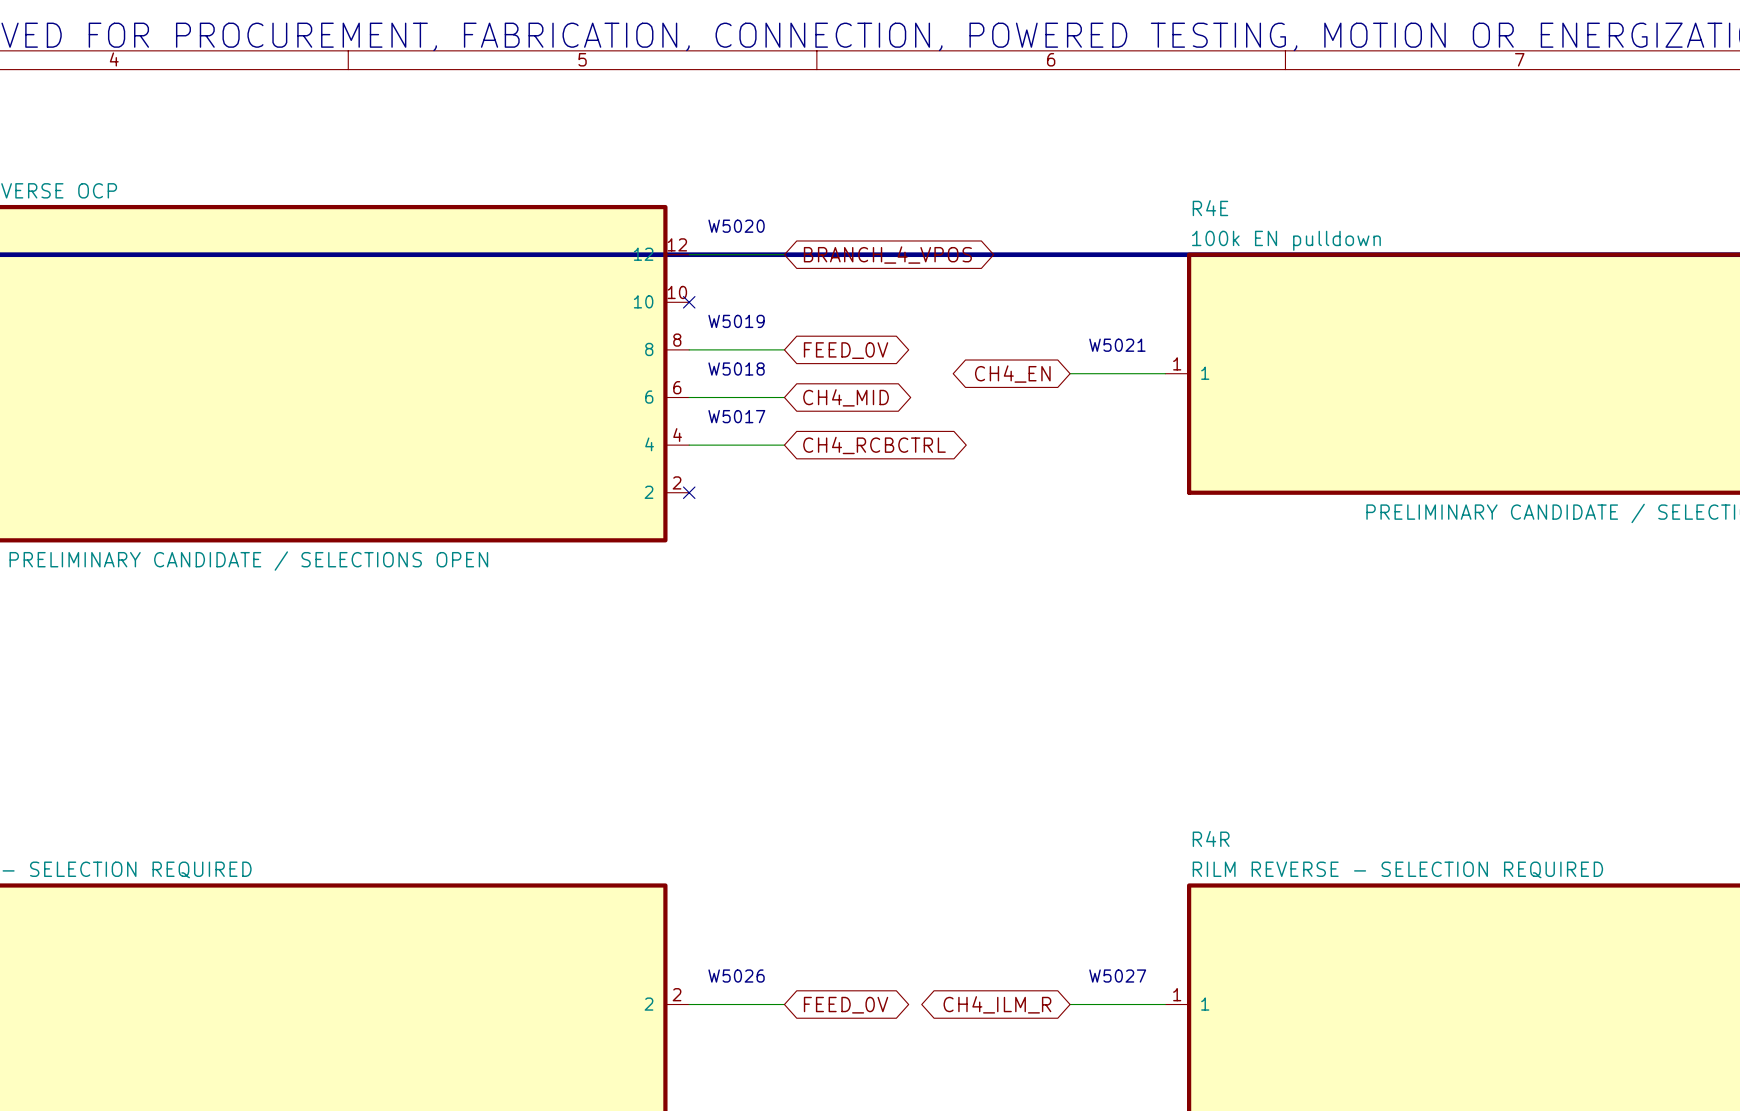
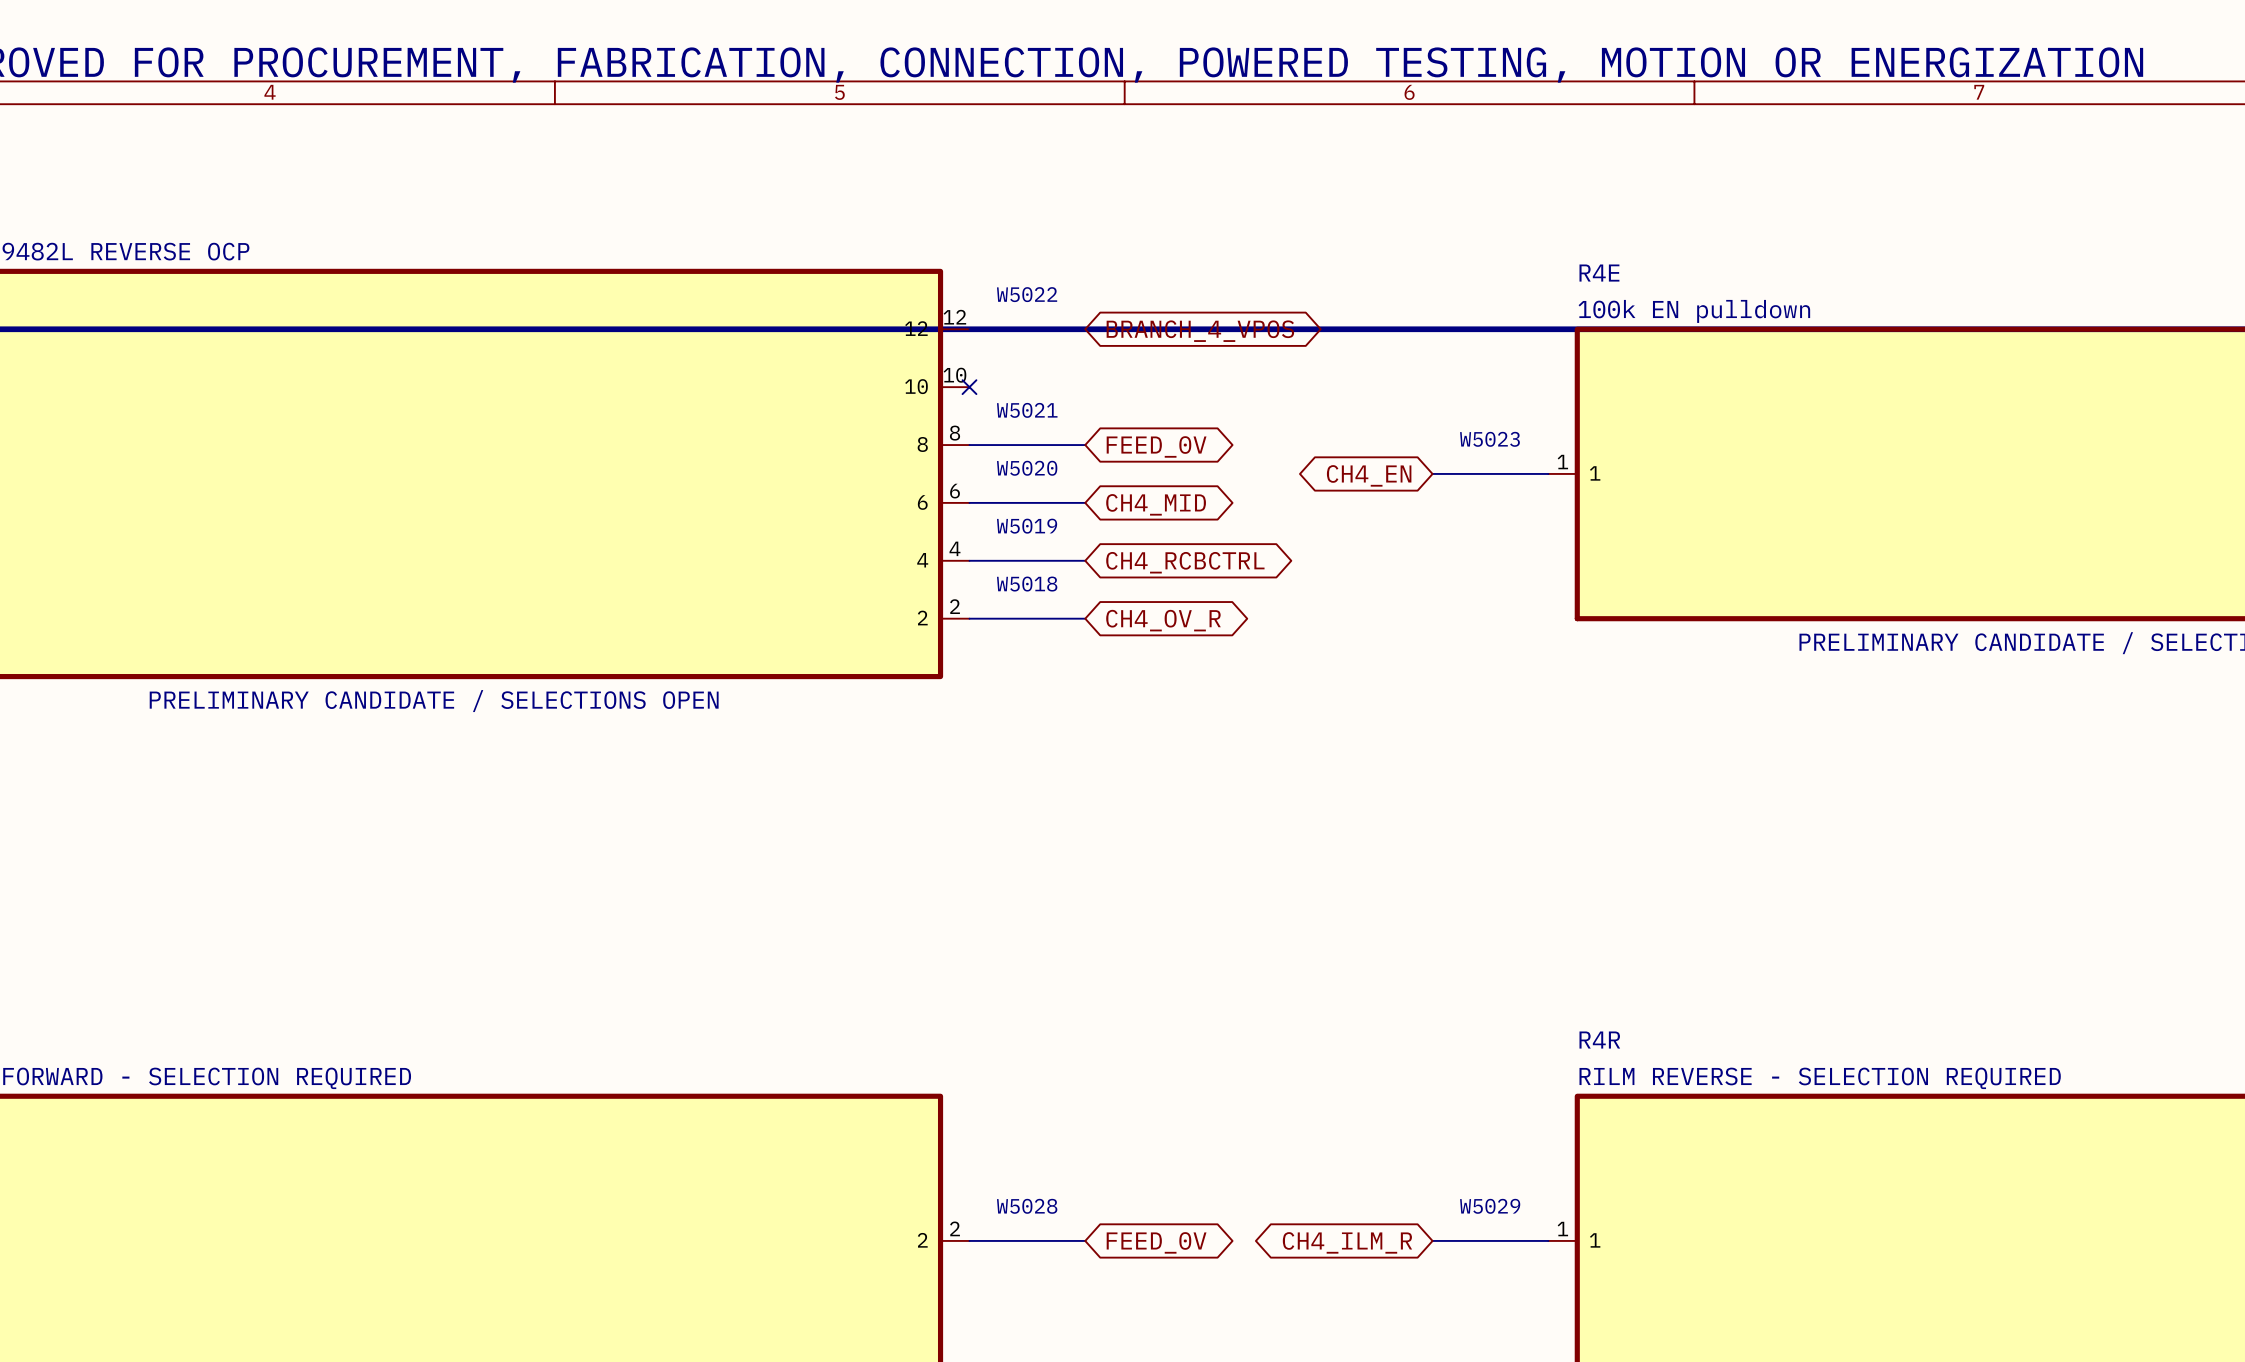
text: W5020 (736, 226) -> W5022 (1027, 294)
text: W5019 (736, 321) -> W5021 (1027, 410)
text: W5021 (1117, 345) -> W5023 (1489, 439)
text: W5018 (736, 369) -> W5020 (1027, 468)
text: W5017 (736, 416) -> W5019 (1027, 526)
text: none -> W5018 (1027, 584)
wire: none -> (969, 618) (1085, 618)
no-connect mark: (689, 492) -> none
global label: none -> CH4_OV_R (1163, 620)
text: W5026 (736, 976) -> W5028 (1027, 1206)
text: W5027 (1117, 976) -> W5029 (1490, 1206)

